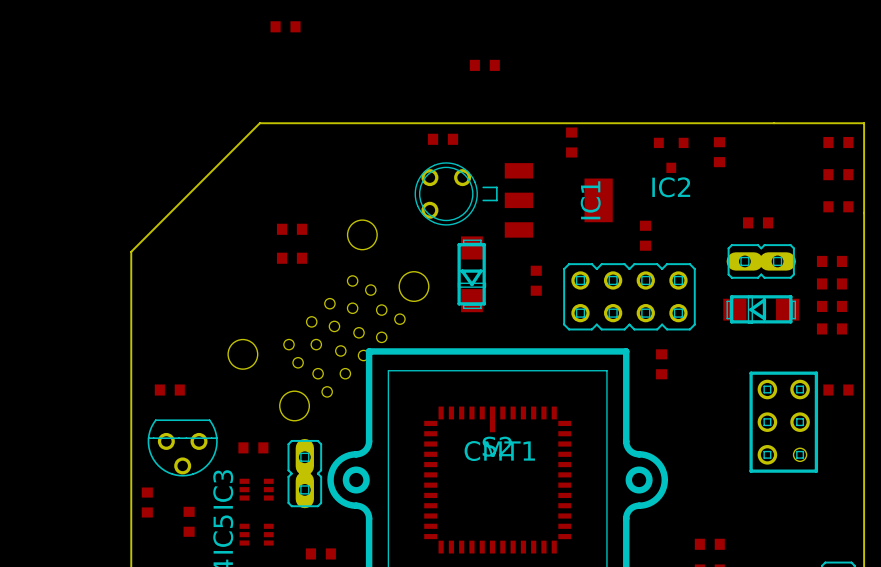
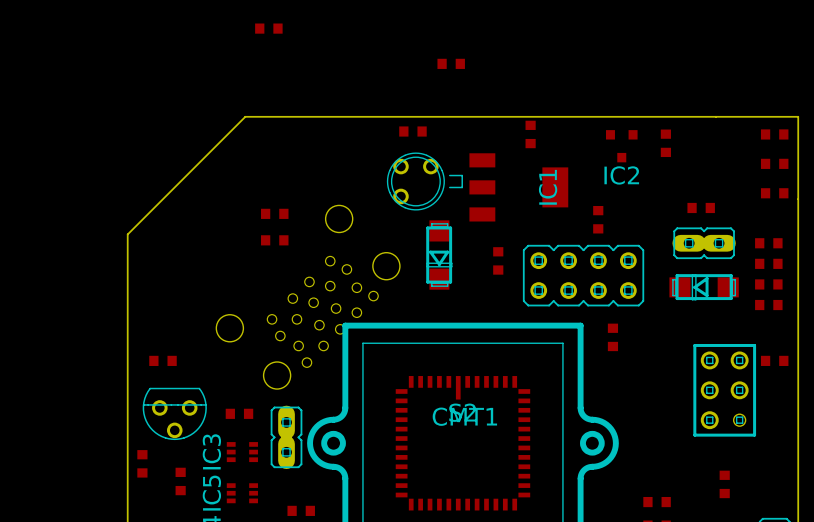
part: none -> (724, 484)

